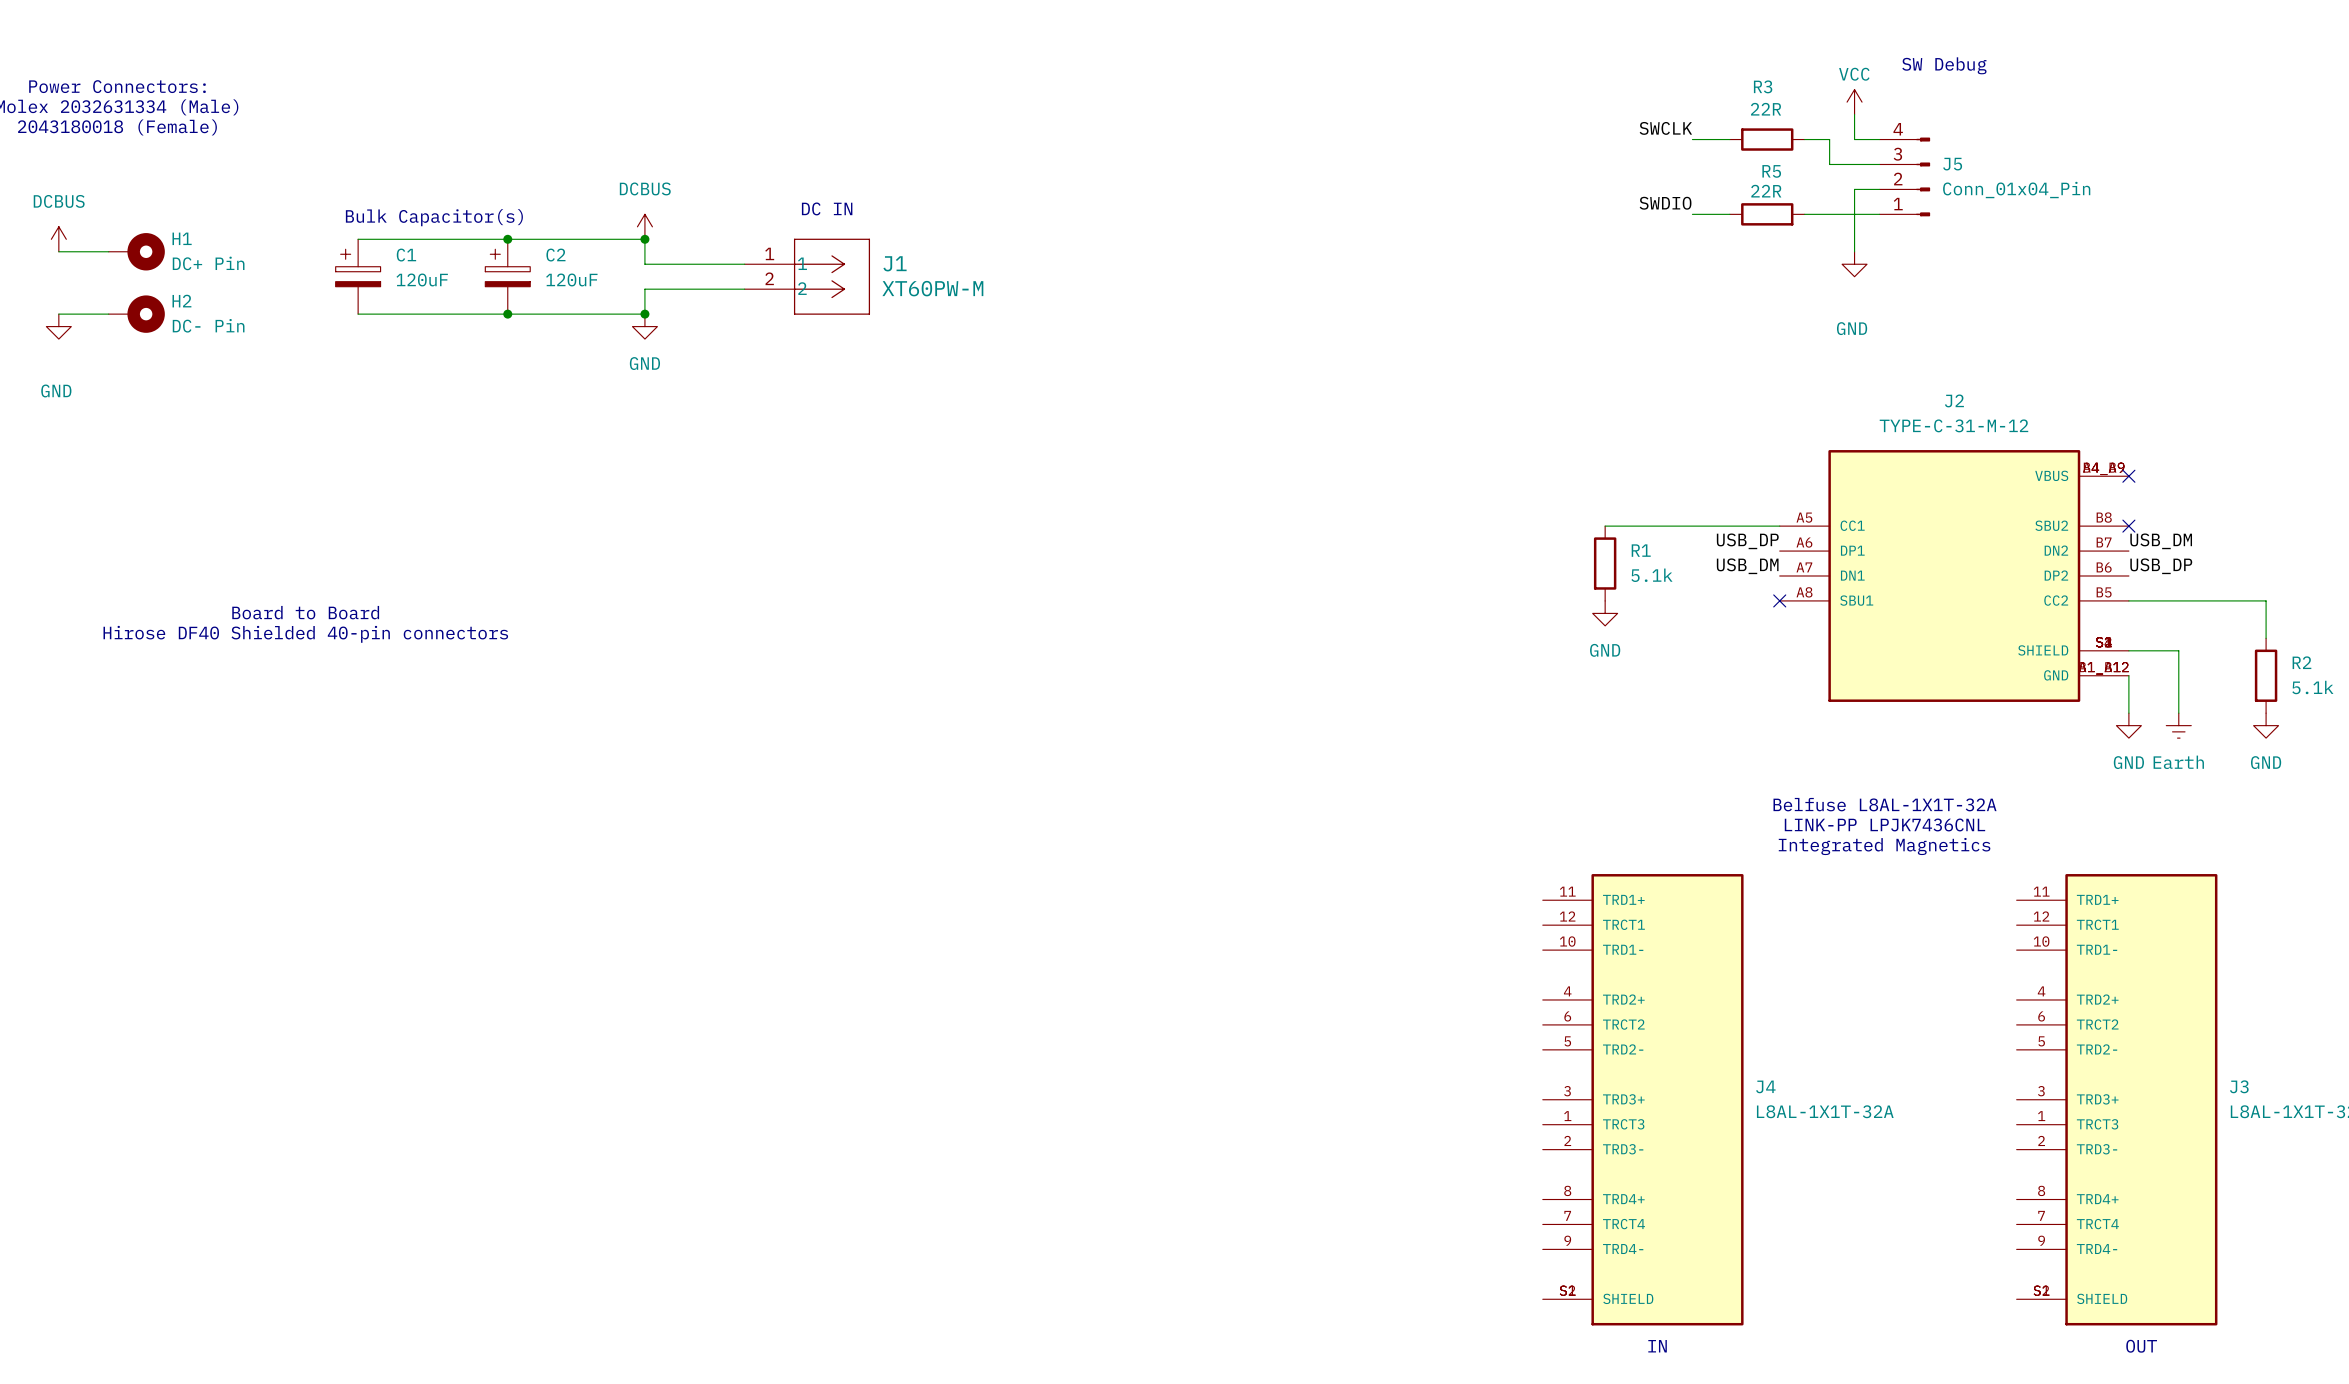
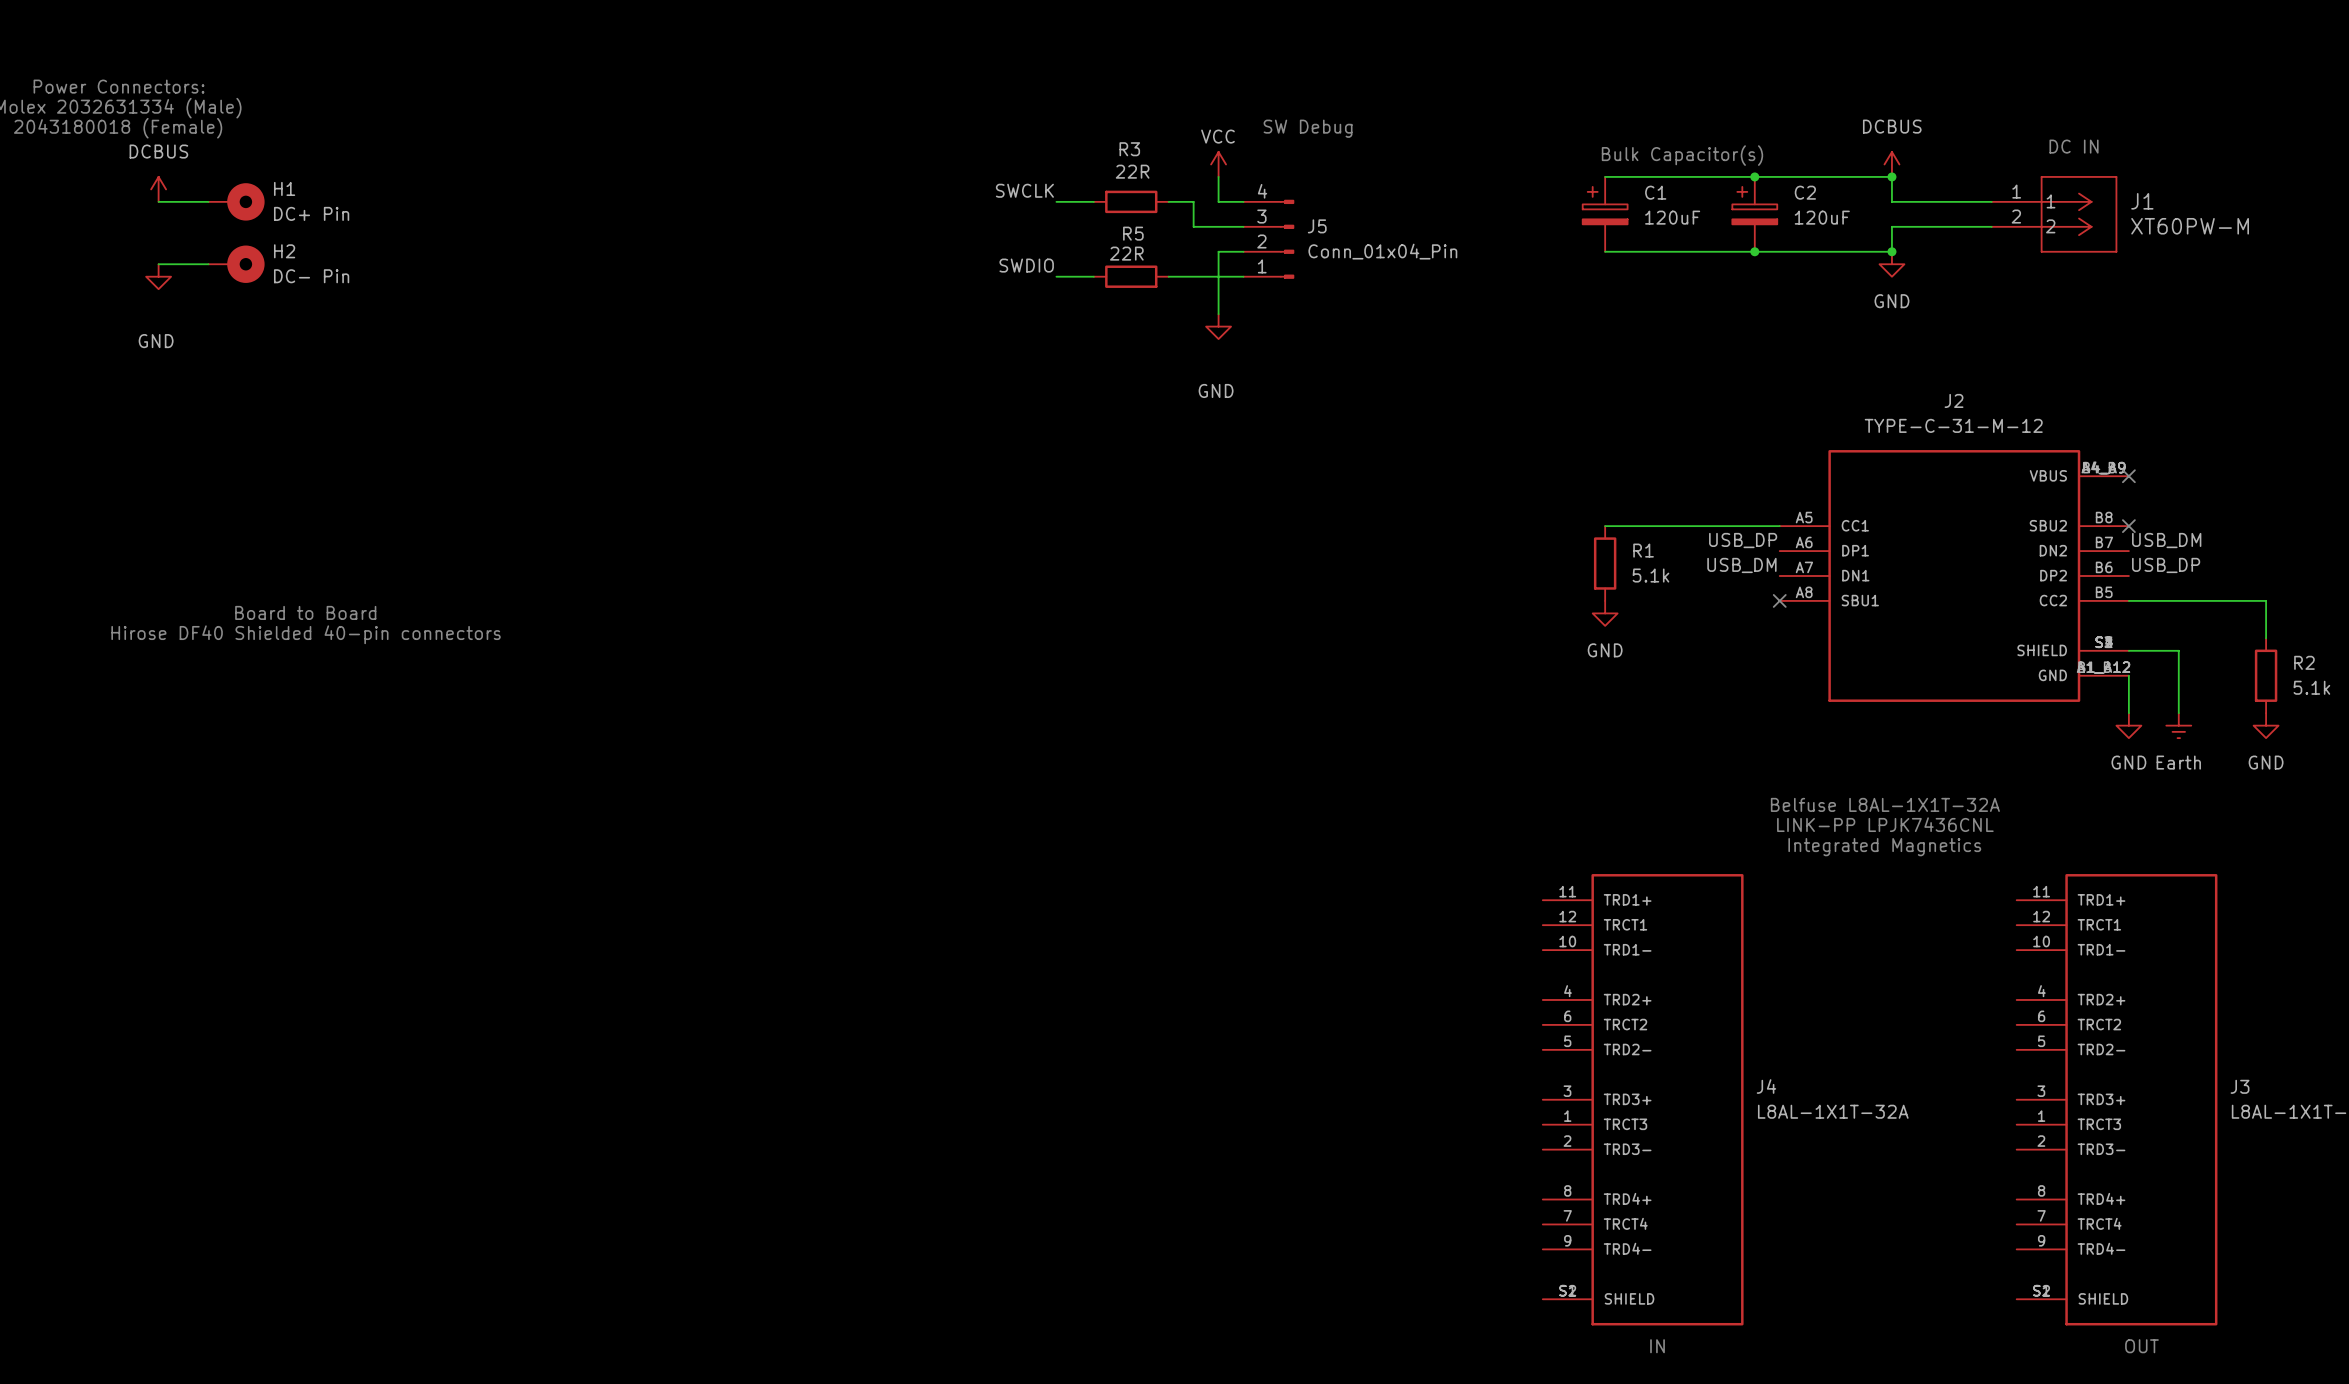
text: SW Debug (1944, 65) -> none
power symbol: VCC (1854, 102) -> none
wire: (1854, 114) (1854, 139) (1879, 139) -> none
text: none -> SW Debug (1308, 128)
label: SWCLK (1665, 128) -> none
wire: (1692, 139) (1729, 139) -> none
R3 position: (1767, 139) -> (1131, 201)
wire: (1804, 139) (1829, 139) (1829, 164) (1879, 164) -> none
text: none -> DC IN (2074, 146)
text: none -> Bulk Capacitor(s) (1682, 155)
power symbol: none -> VCC (1218, 164)
power symbol: none -> DCBUS (1891, 164)
wire: none -> (1218, 176) (1218, 201) (1243, 201)
wire: none -> (1605, 176) (1891, 176) (1891, 201) (1991, 201)
junction: none -> (1754, 176)
junction: none -> (1891, 176)
J5 position: (1904, 176) -> (1268, 239)
wire: (1879, 189) (1854, 189) (1854, 251) -> none
label: none -> SWCLK (1024, 190)
wire: none -> (1056, 201) (1093, 201)
wire: none -> (1168, 201) (1193, 201) (1193, 226) (1243, 226)
label: SWDIO (1665, 203) -> none
text: DC IN (827, 208) -> none
wire: (1692, 214) (1729, 214) -> none
R5 position: (1767, 214) -> (1131, 276)
wire: (1804, 214) (1879, 214) -> none
text: Bulk Capacitor(s) (434, 217) -> none
power symbol: DCBUS (644, 226) -> none
wire: none -> (1991, 226) (1891, 226) (1891, 251) (1605, 251)
power symbol position: DCBUS (58, 239) -> DCBUS (158, 189)
wire: (358, 239) (644, 239) (644, 264) (744, 264) -> none
junction: (507, 239) -> none
junction: (644, 239) -> none
wire: (58, 251) (108, 251) -> (158, 201) (208, 201)
H1 position: (136, 251) -> (236, 201)
wire: none -> (1243, 251) (1218, 251) (1218, 314)
junction: none -> (1754, 251)
junction: none -> (1891, 251)
power symbol position: GND (1854, 264) -> GND (1891, 264)
label: none -> SWDIO (1026, 265)
C1 position: (358, 276) -> (1605, 214)
C2 position: (507, 276) -> (1754, 214)
J1 position: (807, 276) -> (2054, 214)
wire: none -> (1056, 276) (1093, 276)
wire: none -> (1168, 276) (1243, 276)
wire: (744, 289) (644, 289) (644, 314) (358, 314) -> none
wire: (58, 314) (108, 314) -> (158, 264) (208, 264)
H2 position: (136, 314) -> (236, 264)
junction: (507, 314) -> none
junction: (644, 314) -> none
power symbol position: GND (58, 326) -> GND (158, 276)
power symbol: GND (644, 326) -> none
power symbol: none -> GND (1218, 326)
power symbol text position: GND (1852, 328) -> GND (1891, 301)

